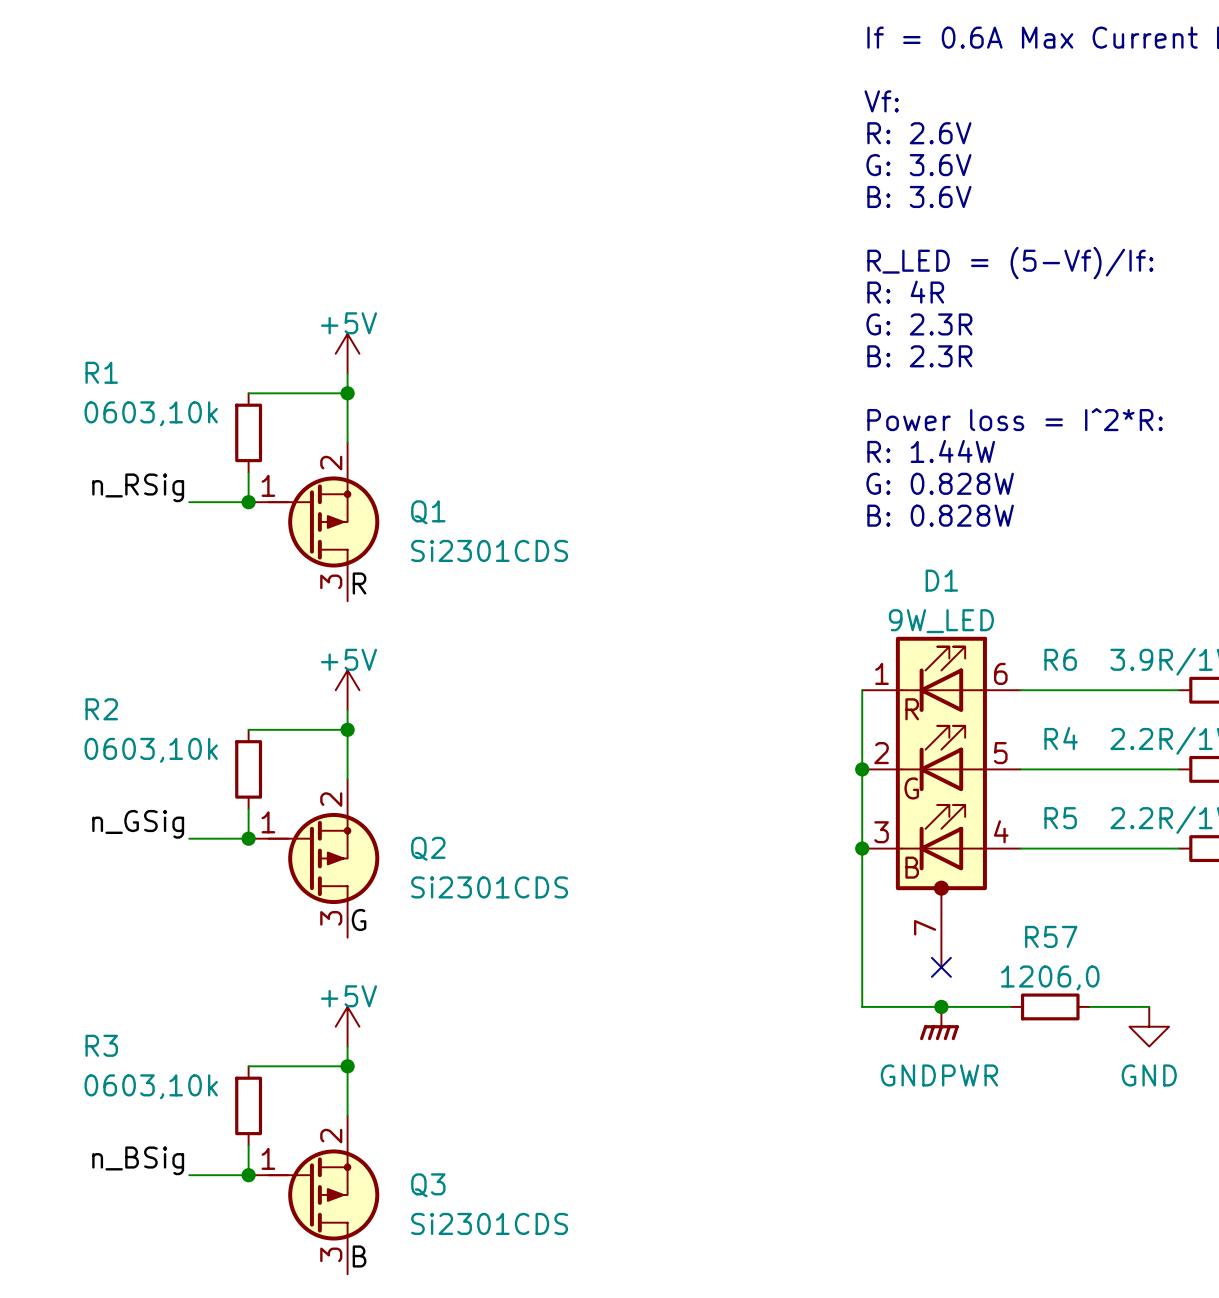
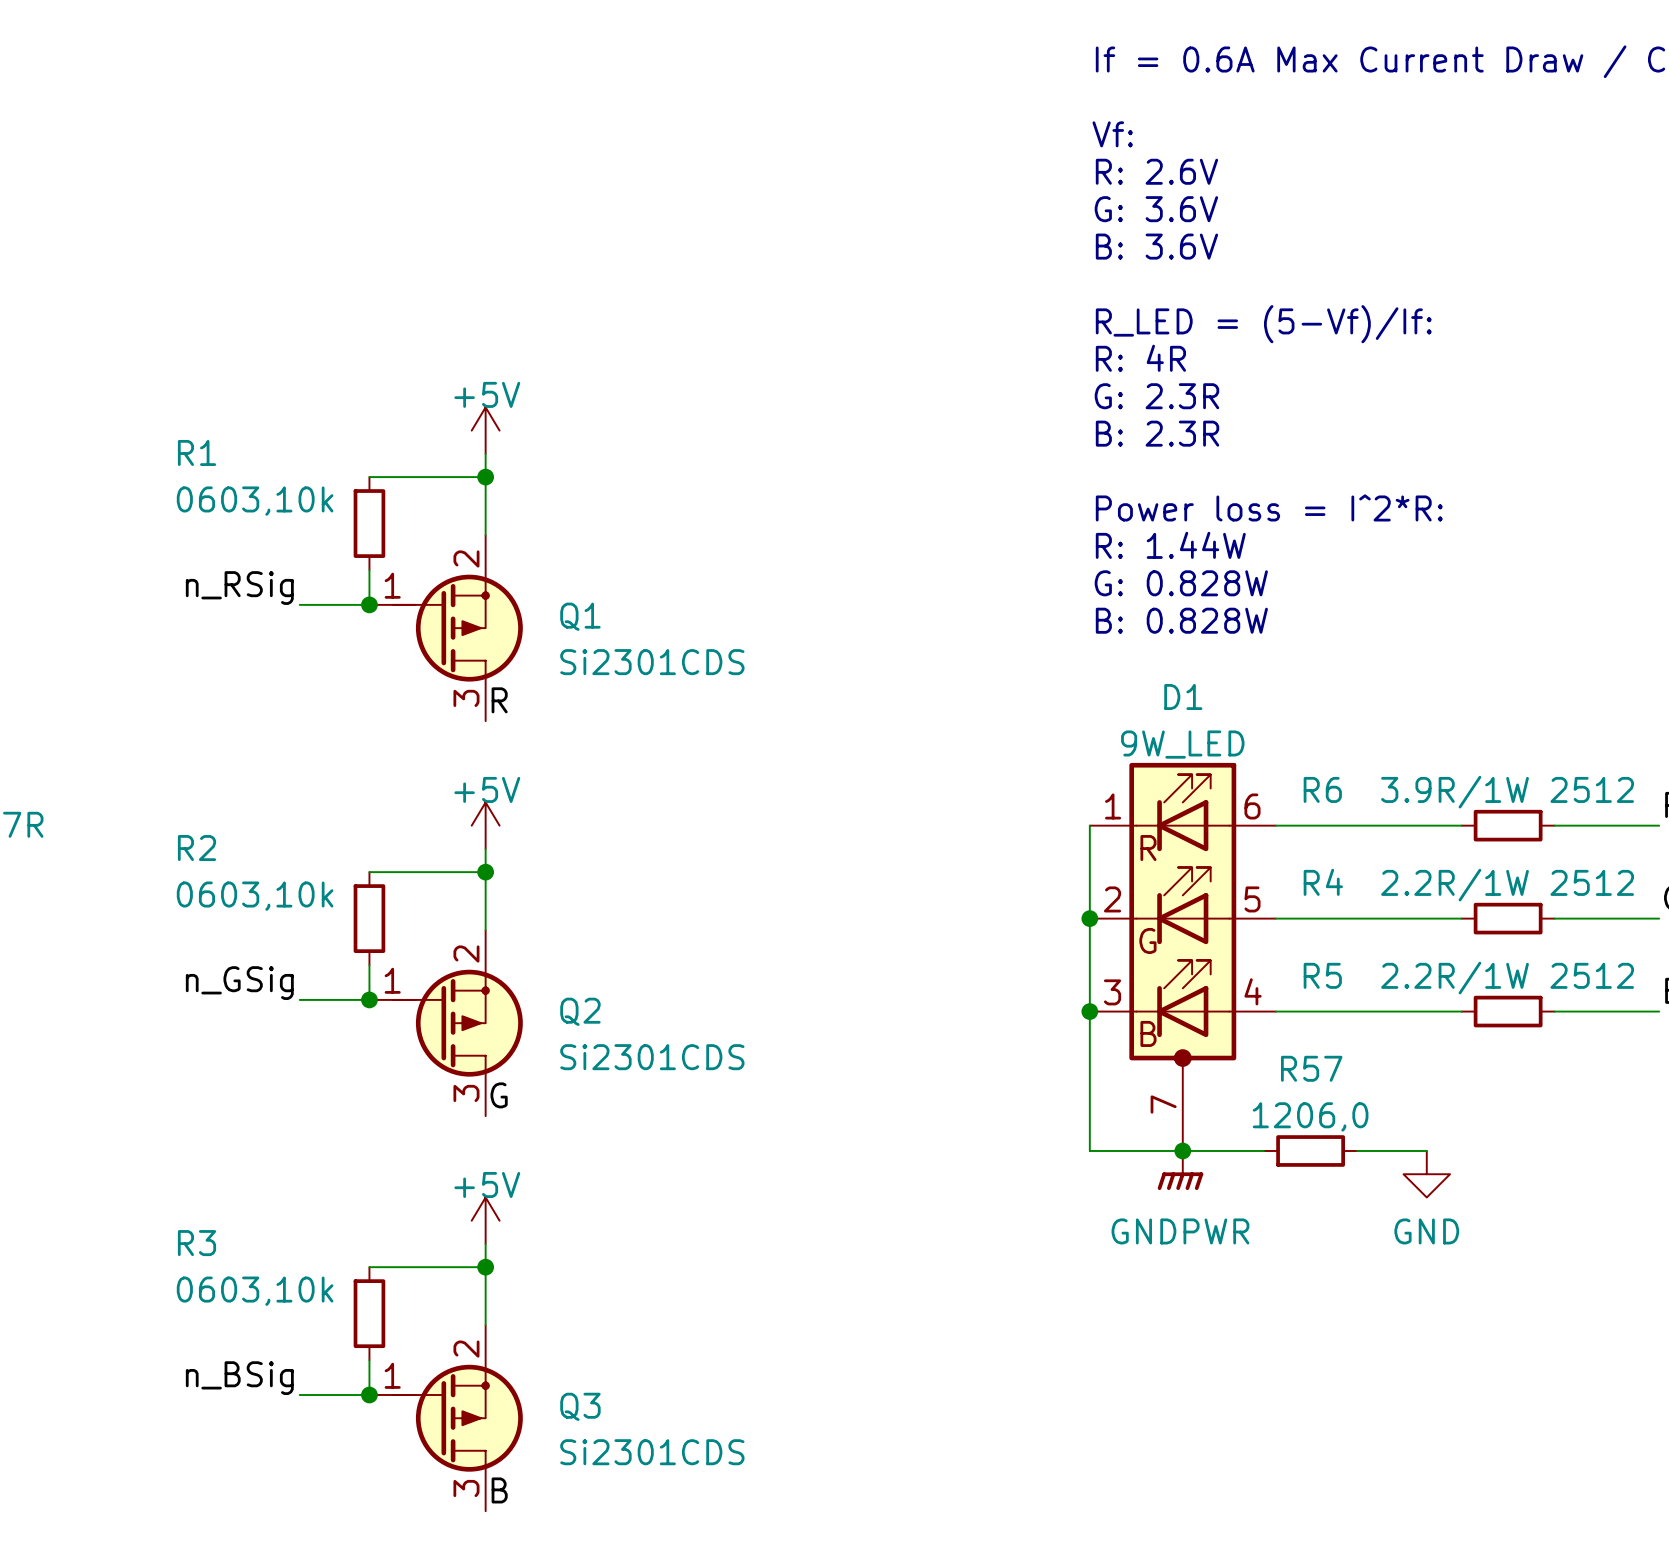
wire: (862, 967) (862, 1006) (1010, 1006) -> (1089, 1150) (1264, 1150)
no-connect mark: (941, 967) -> none
junction position: (941, 1006) -> (1182, 1150)
R57 position: (1050, 1006) -> (1310, 1150)
wire: (1089, 1006) (1149, 1006) -> (1357, 1150) (1426, 1150)
power symbol position: GNDPWR (939, 1023) -> GNDPWR (1180, 1170)
power symbol position: GND (1149, 1026) -> GND (1426, 1174)

